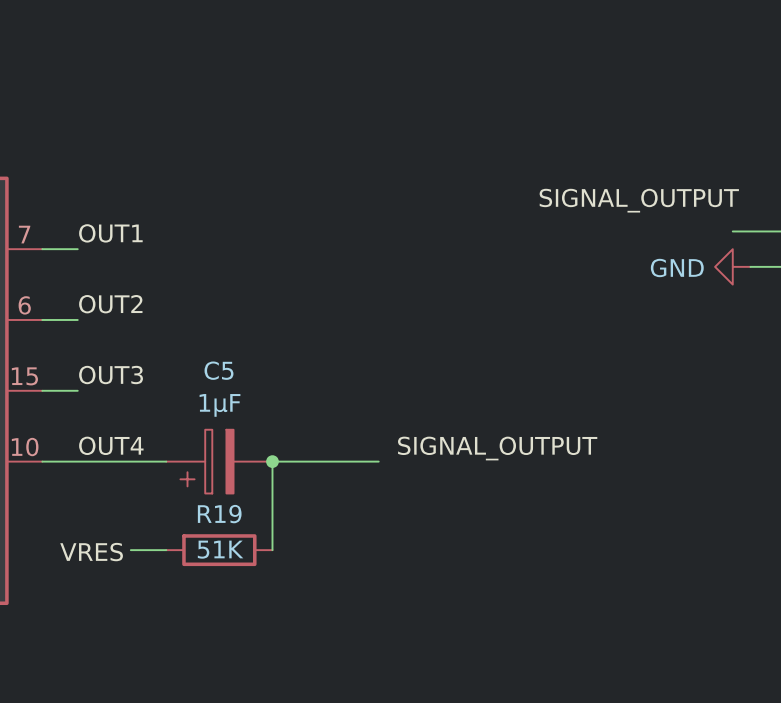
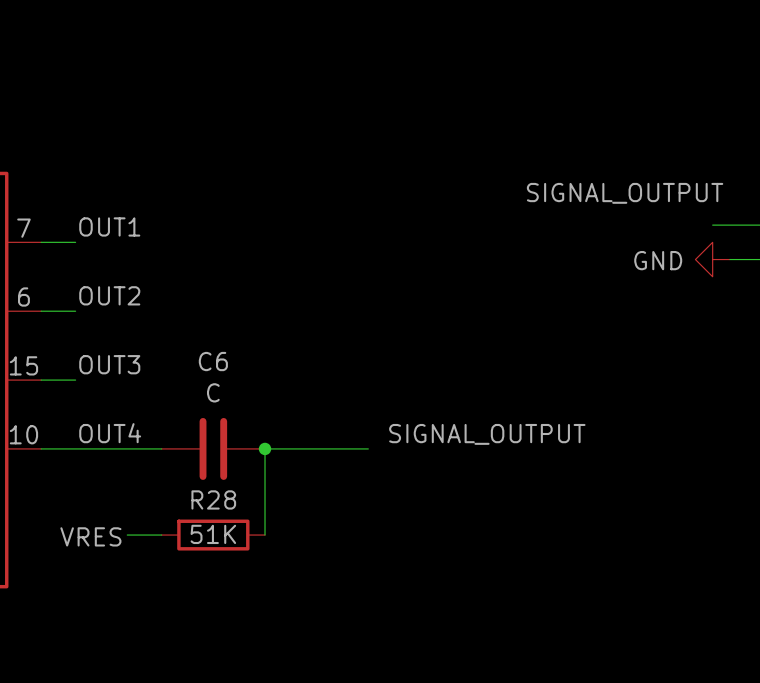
C5: 1µF (219, 461) -> none
C6: none -> C (213, 448)
R19 name: R19 (219, 514) -> R28 (213, 499)

